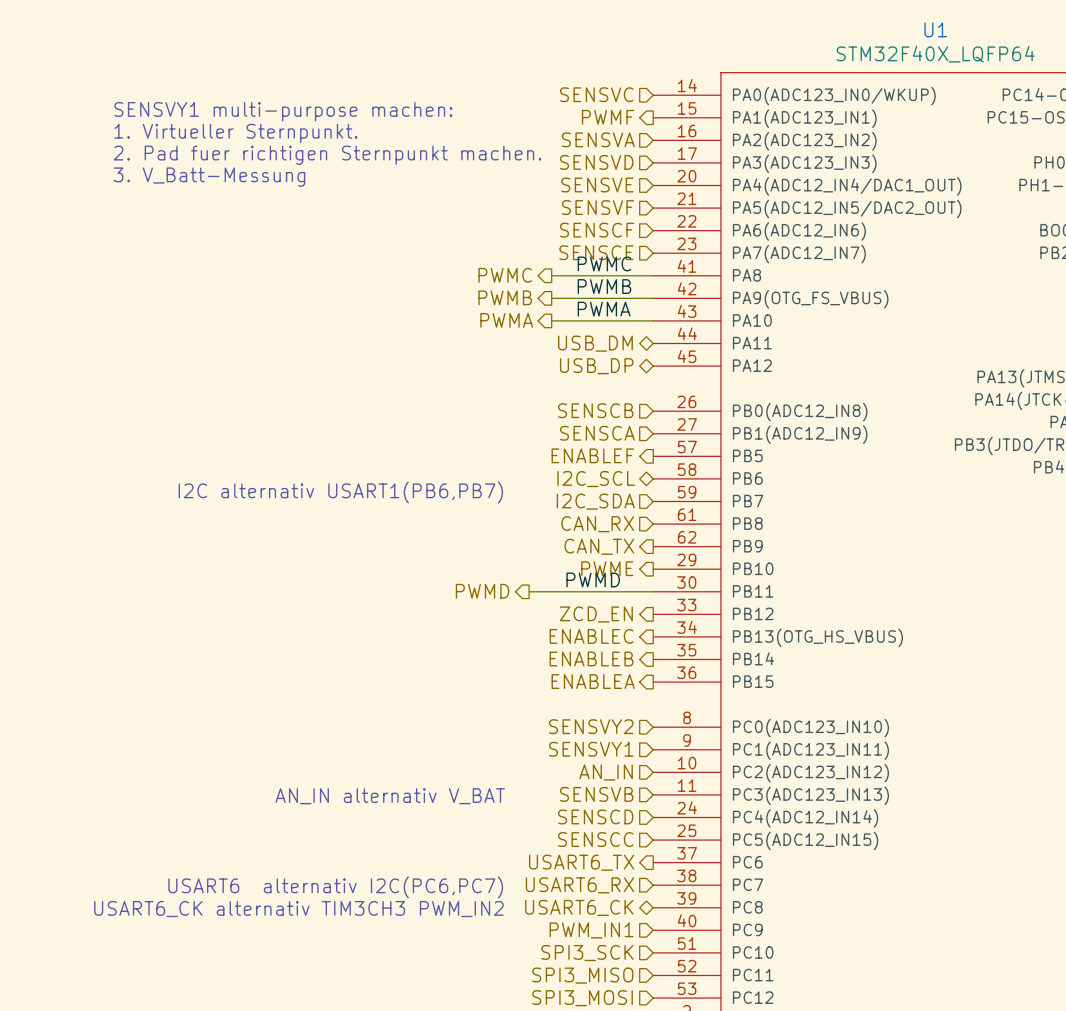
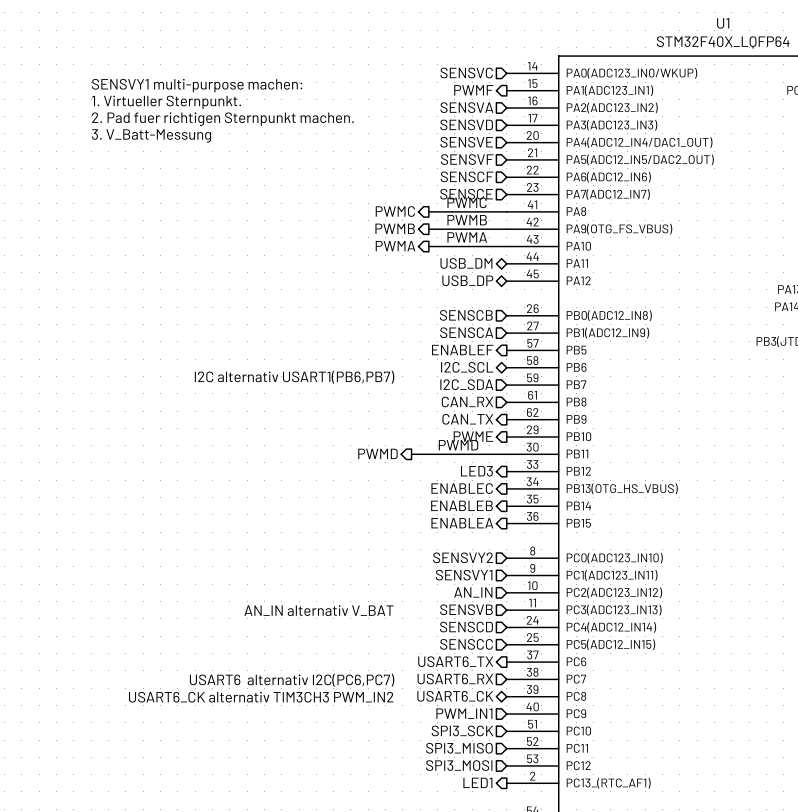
hierarchical label: ZCD_EN (596, 614) -> LED3 (476, 471)

